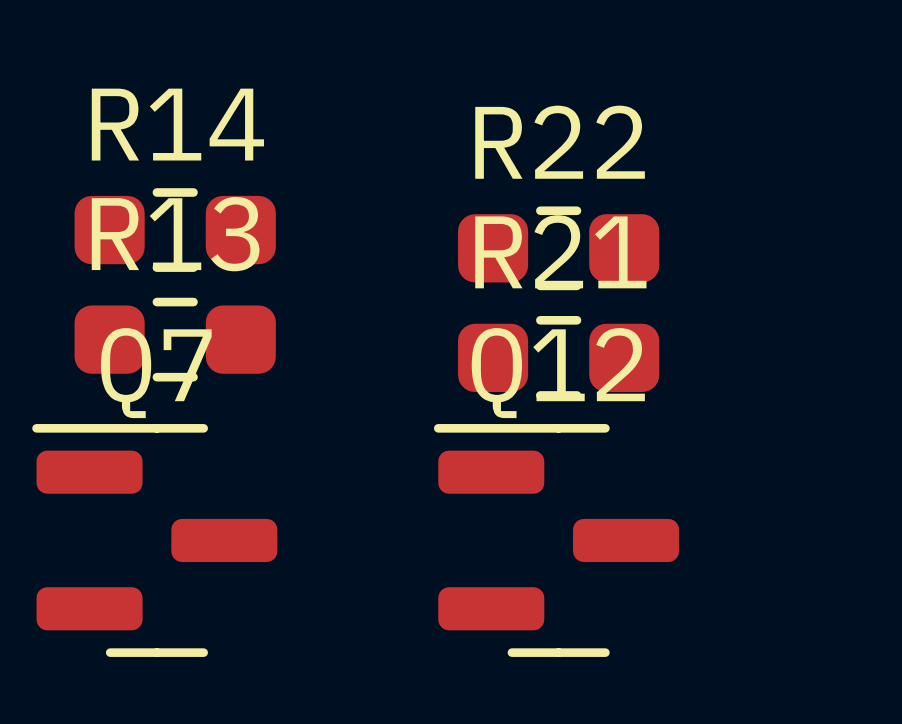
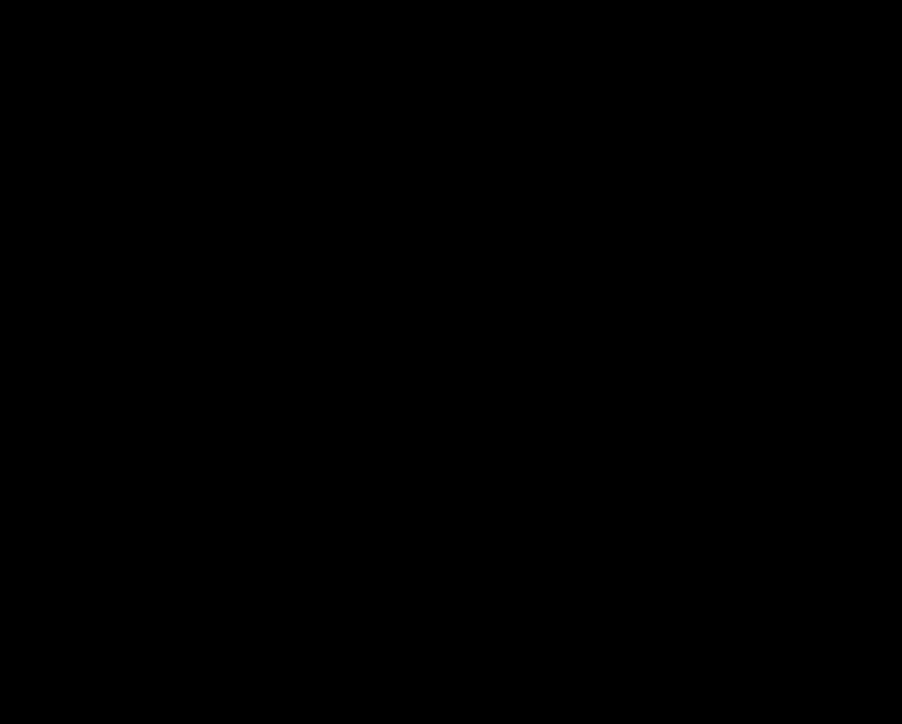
R14: (175, 230) -> none
R22: (558, 248) -> none
R13: (175, 339) -> none
R21: (558, 357) -> none
Q7: (154, 540) -> none
Q12: (556, 540) -> none

